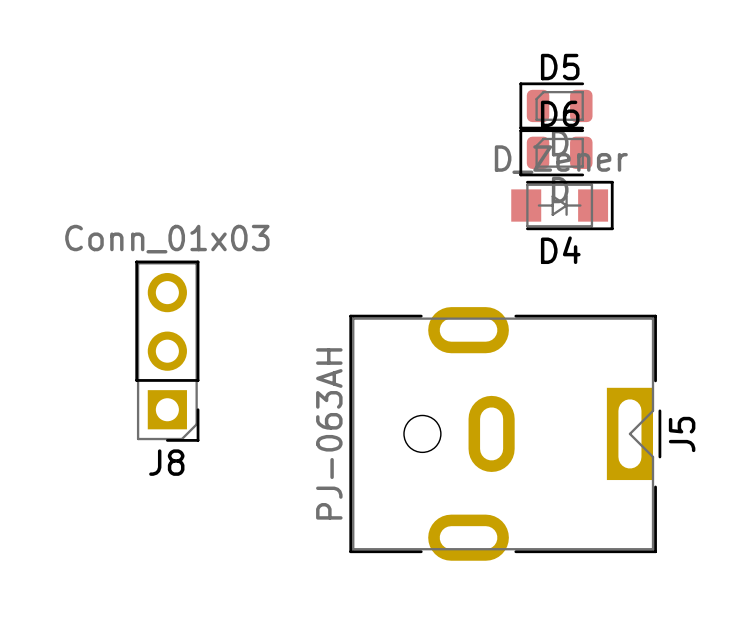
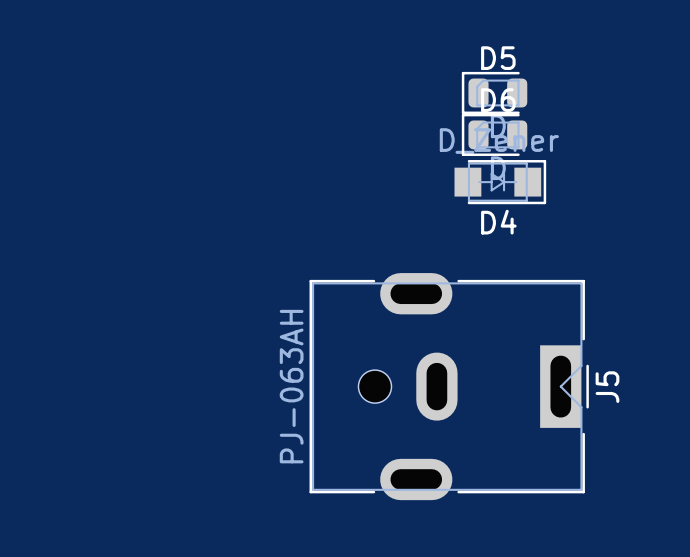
J8: Conn_01x03 (167, 351) -> none

